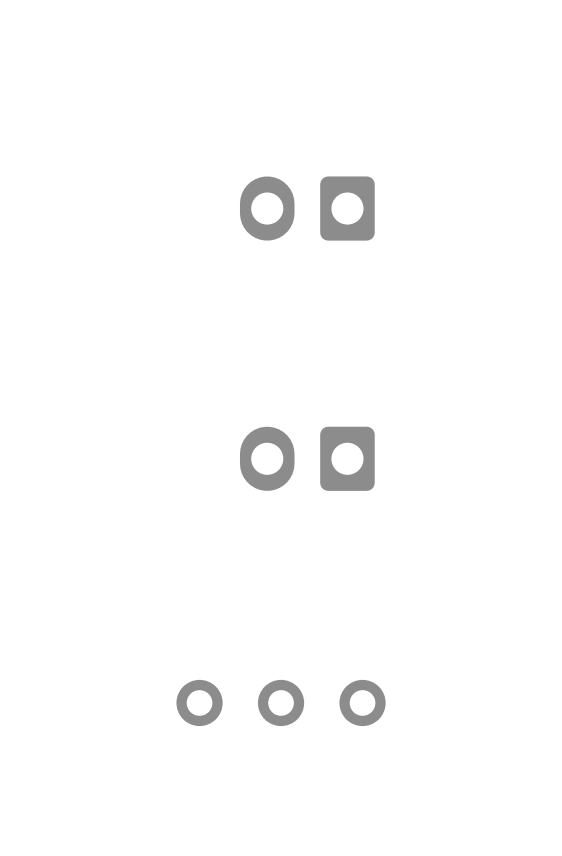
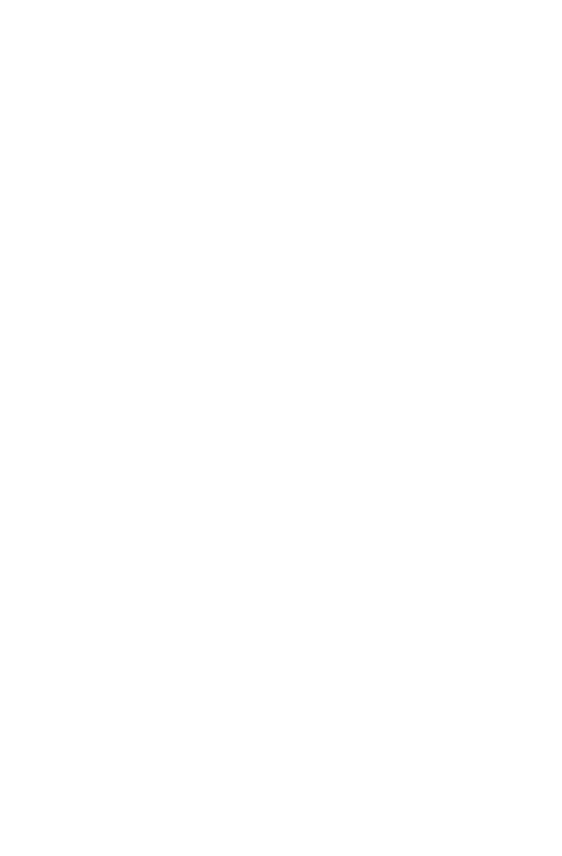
part: (307, 208) -> none
part: (307, 458) -> none
part: (281, 702) -> none

